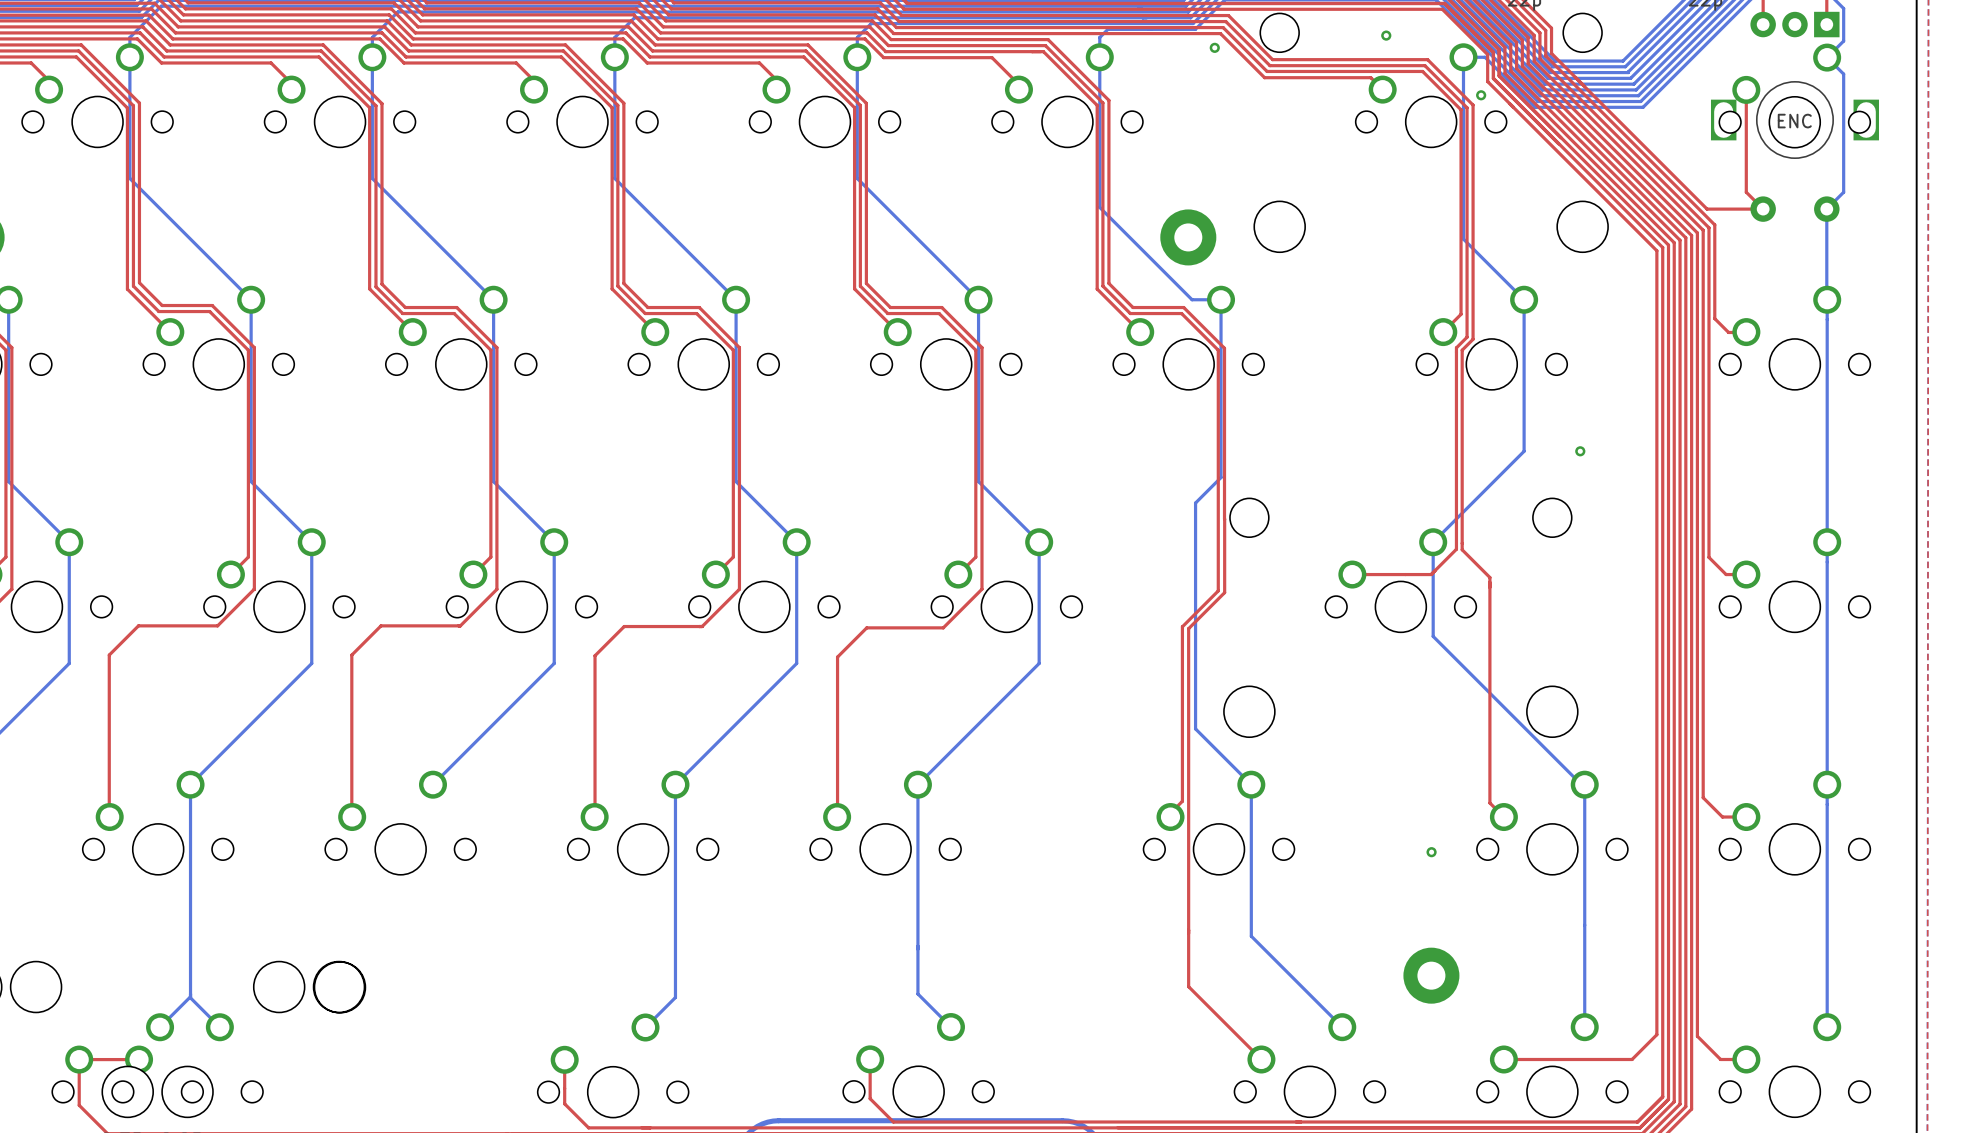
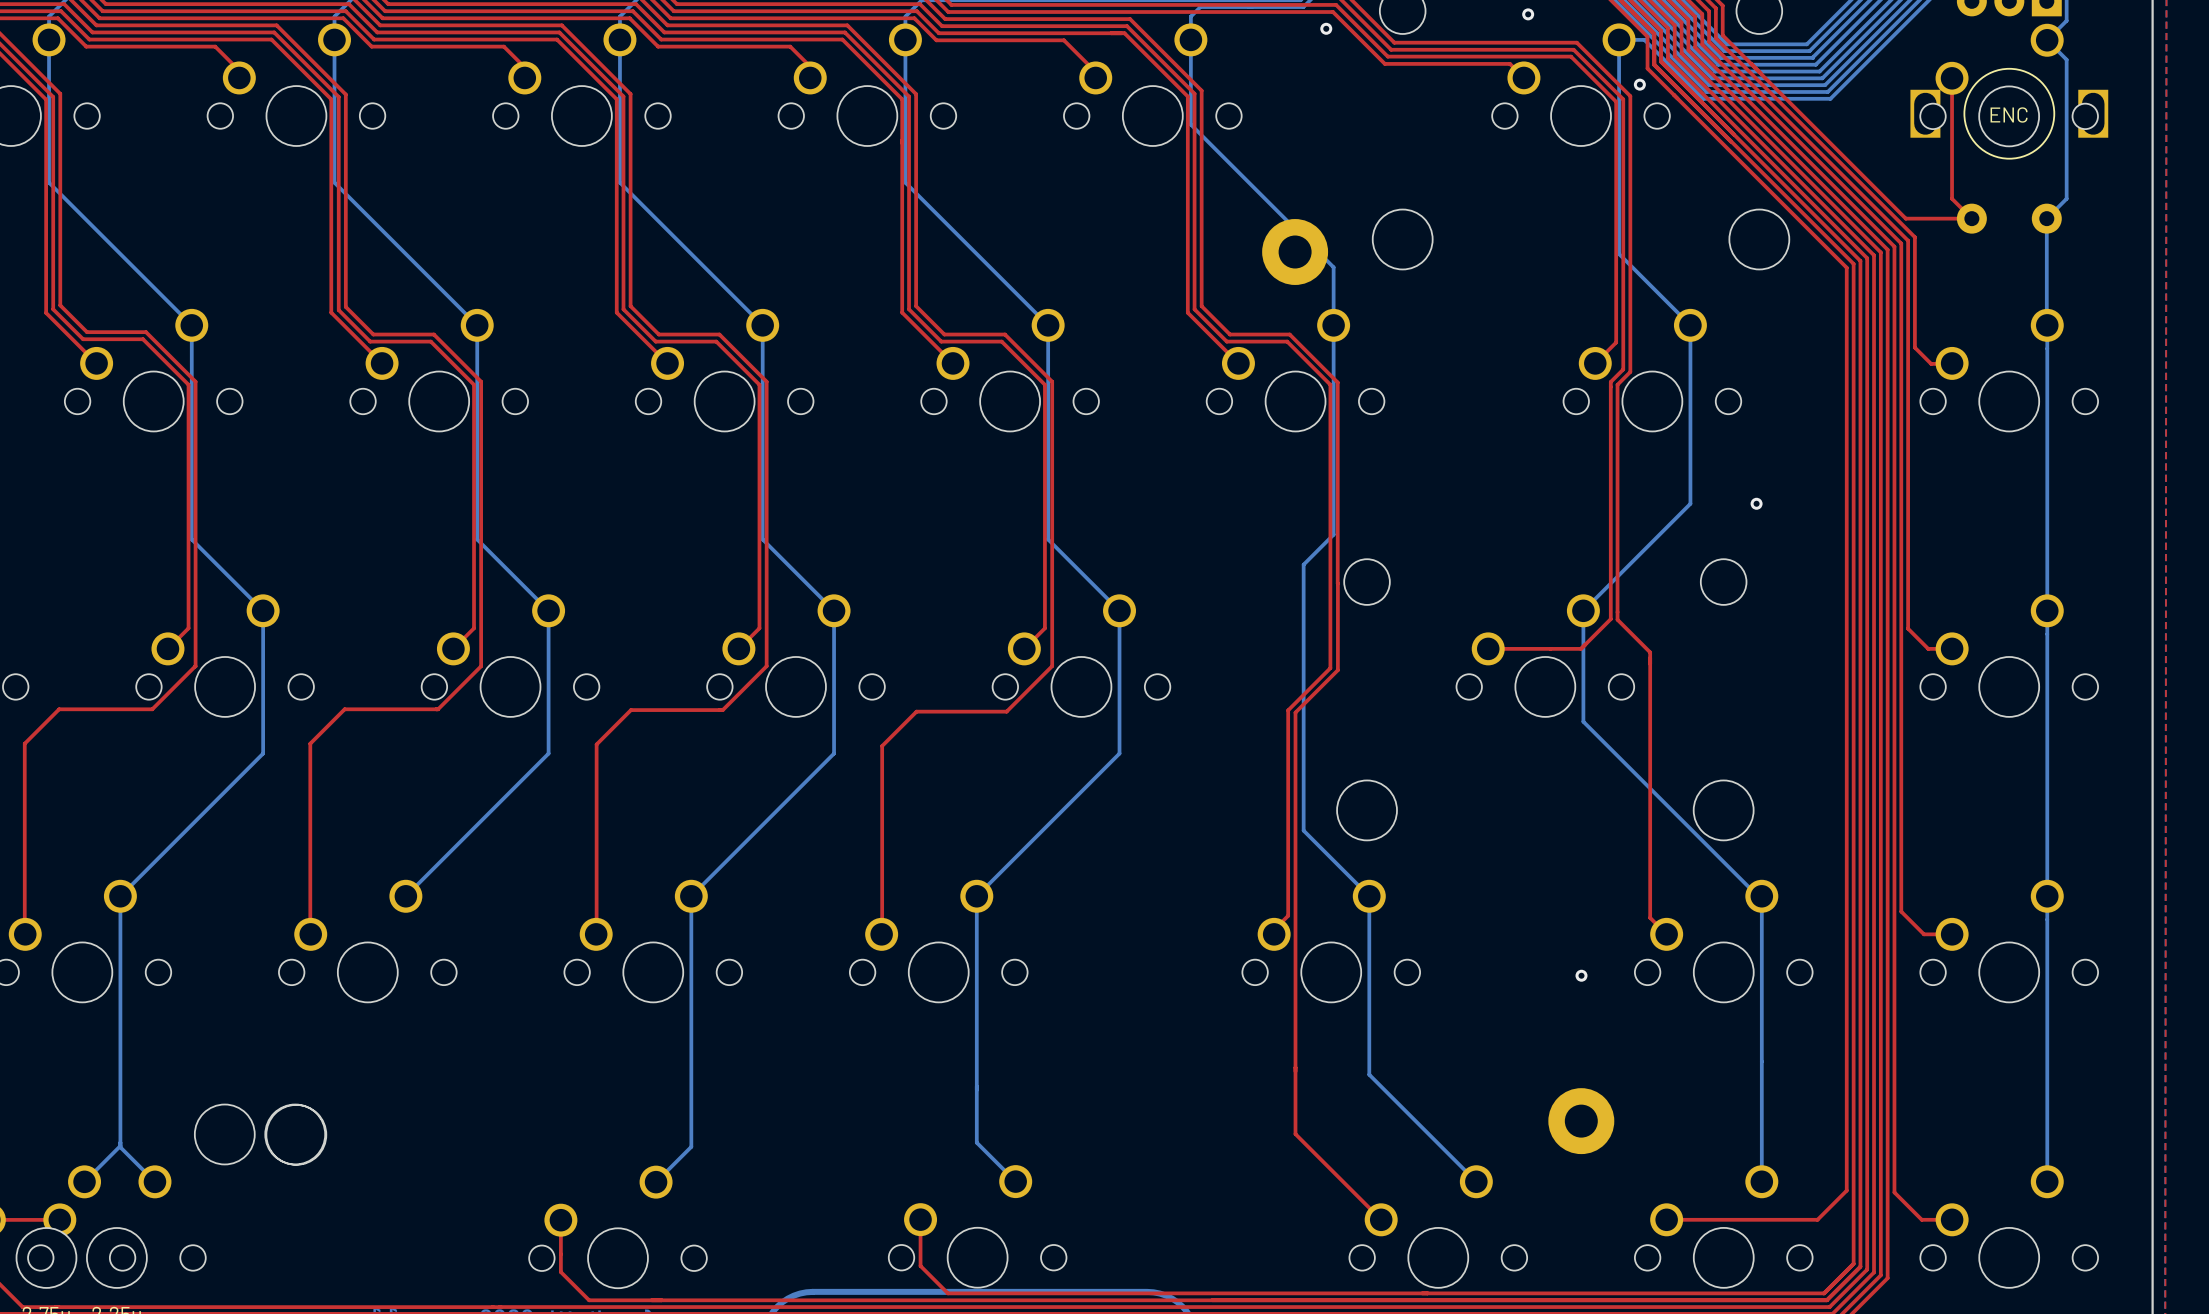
bottom track: (1099, 129) (1099, 207) (1192, 299) (1221, 299) -> (1190, 124) (1333, 267) (1333, 325)

